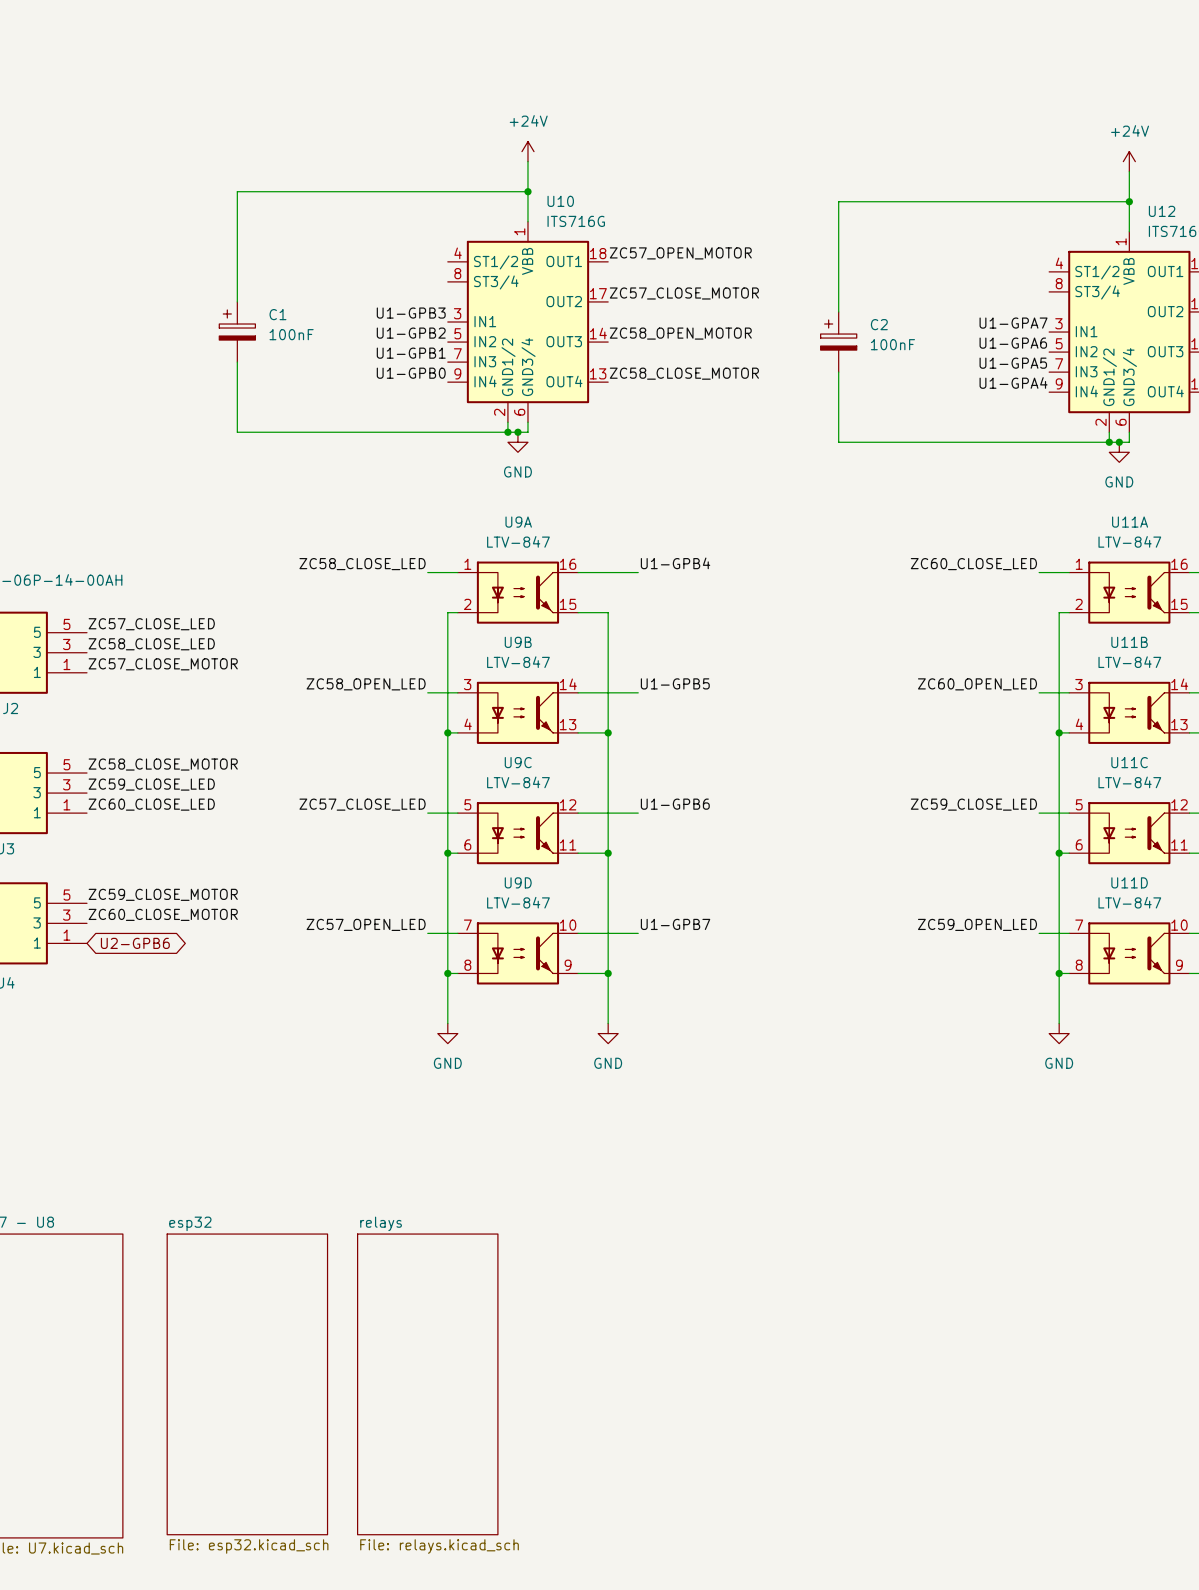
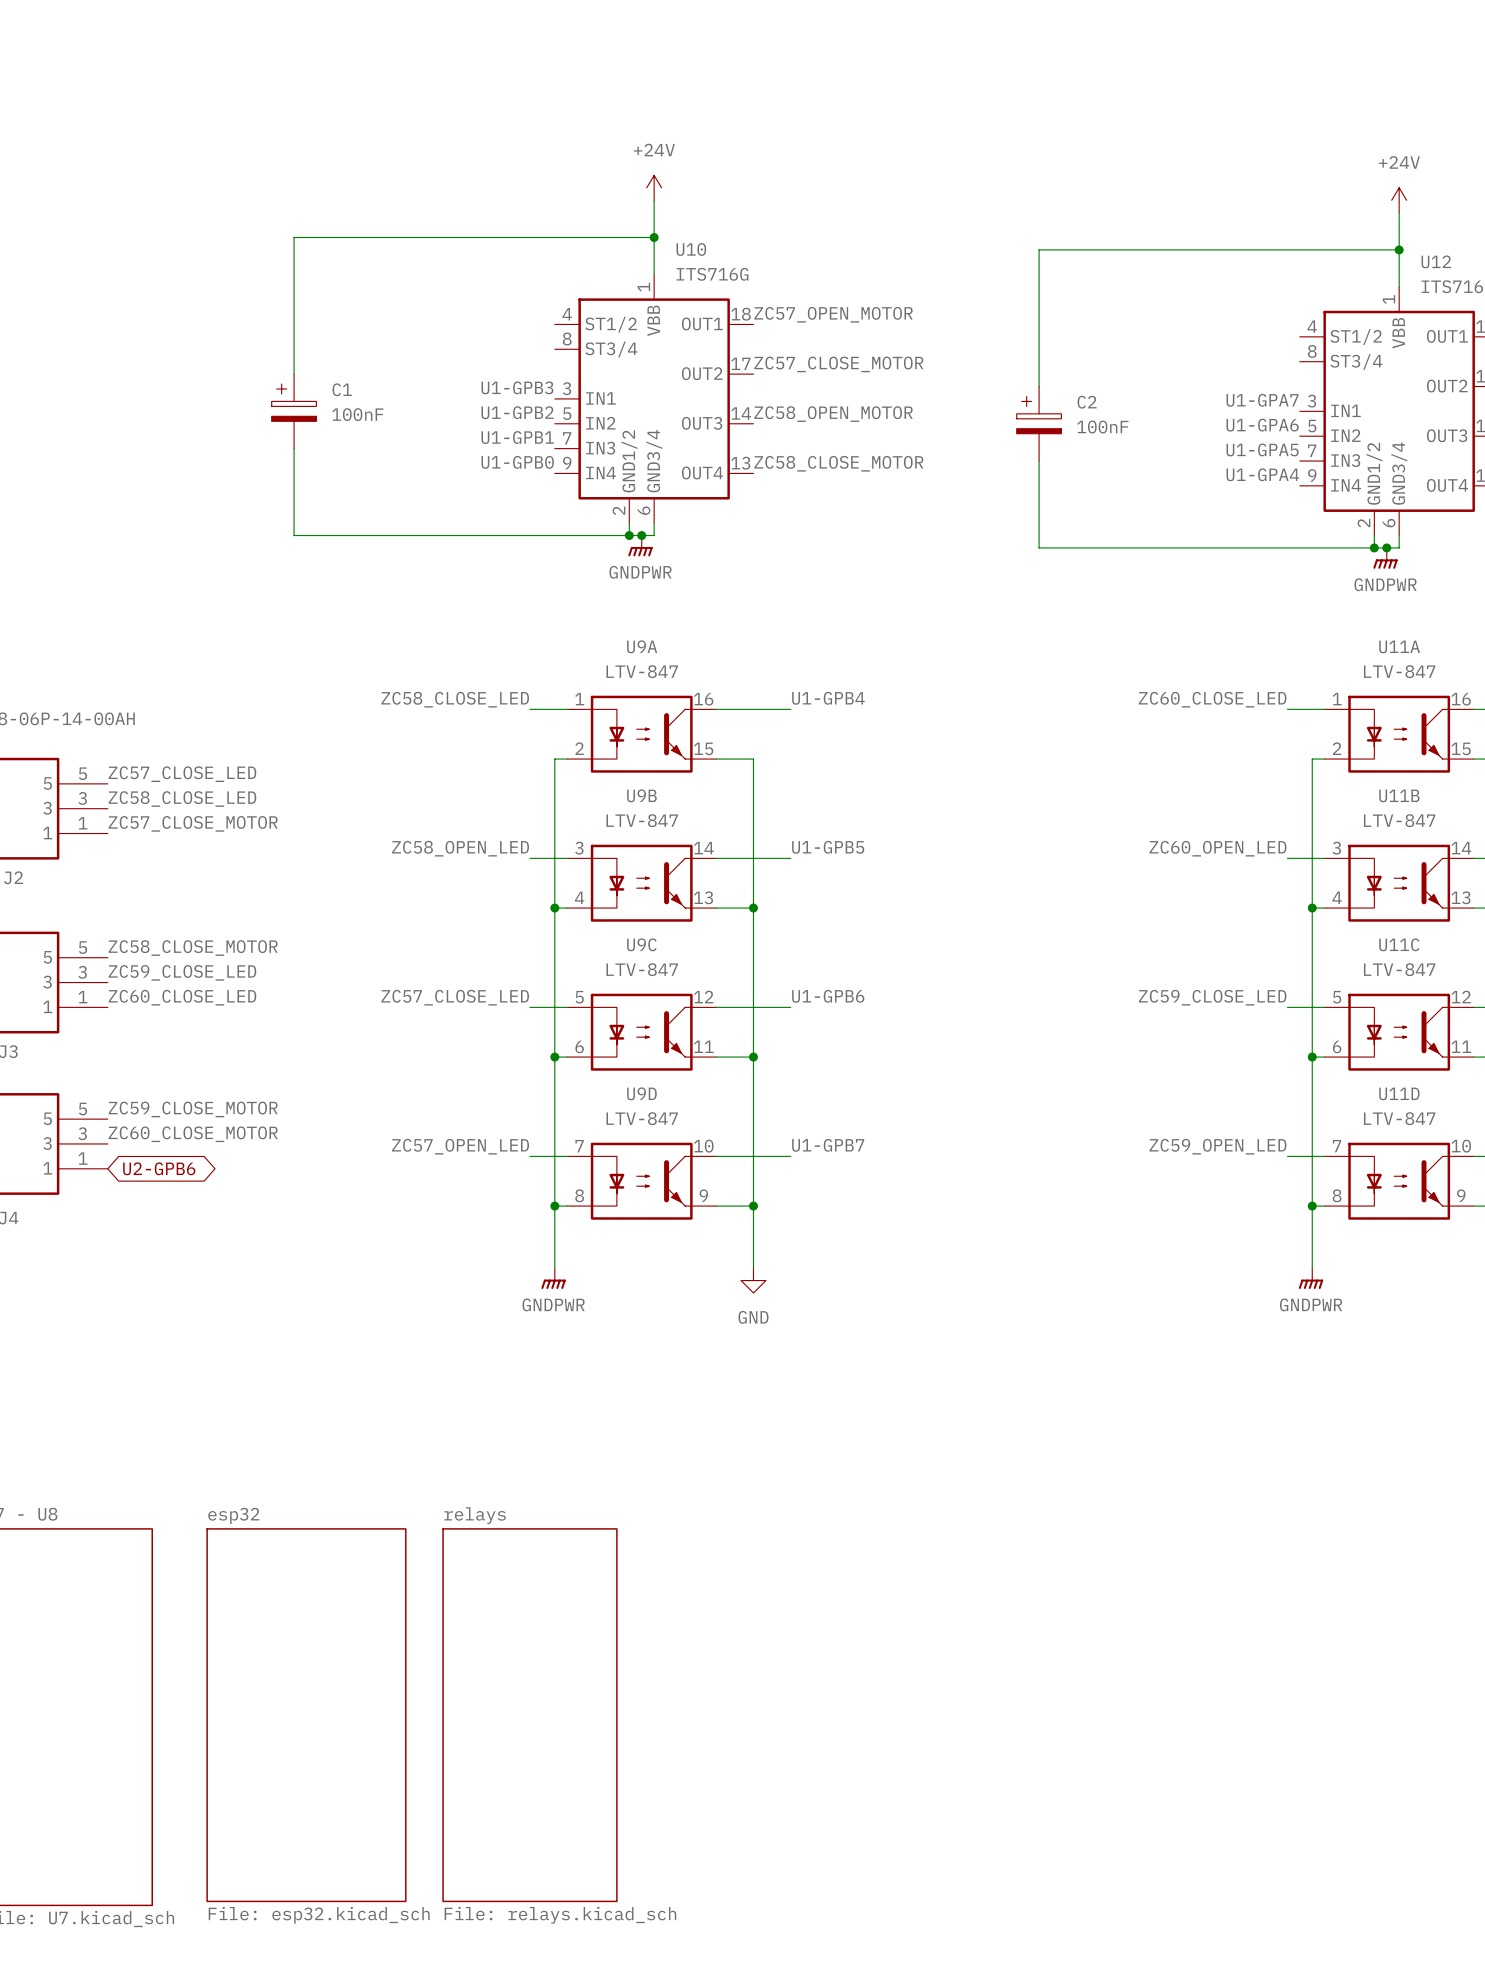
power symbol: GND (517, 442) -> GNDPWR (640, 545)
power symbol: GND (1119, 452) -> GNDPWR (1385, 558)
power symbol: GND (447, 1033) -> GNDPWR (553, 1278)
power symbol: GND (1059, 1033) -> GNDPWR (1311, 1278)

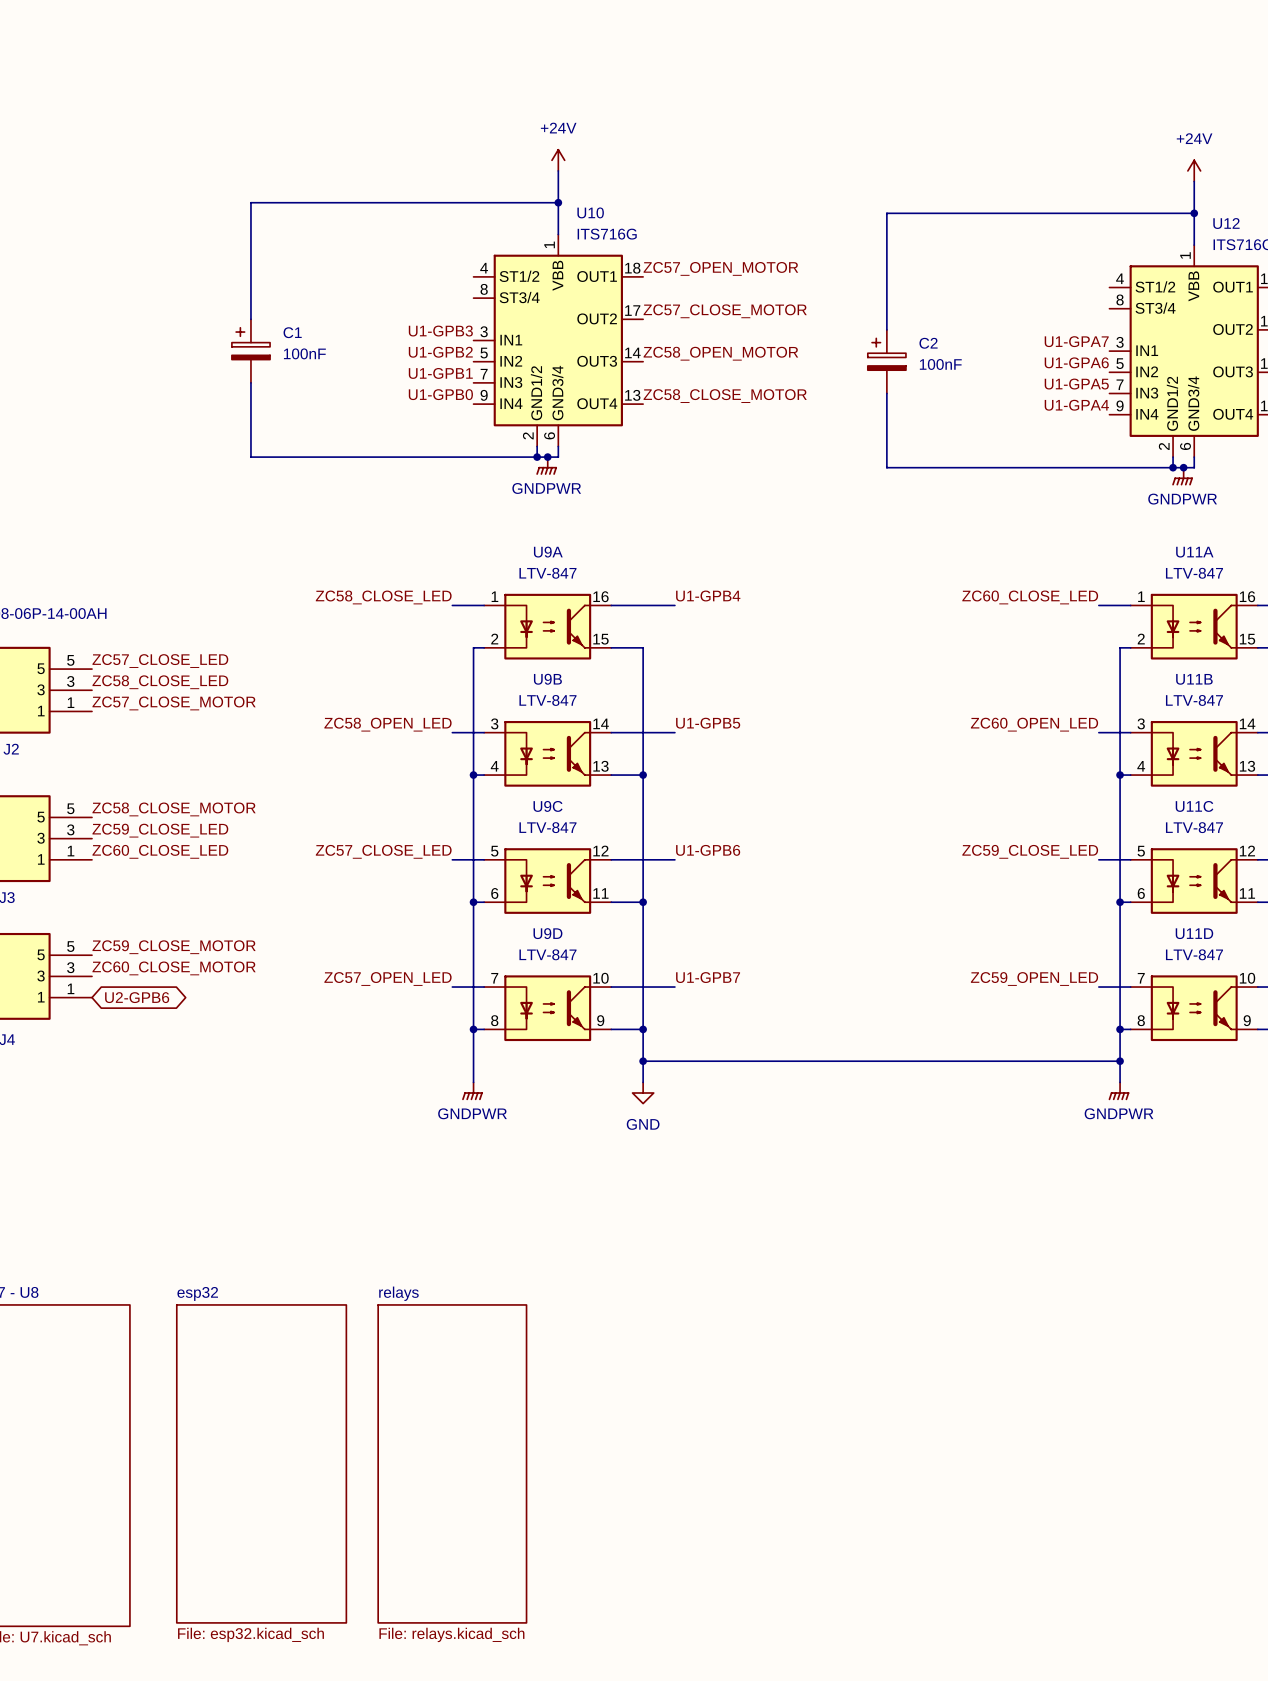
wire: none -> (643, 1061) (1120, 1061)
junction: none -> (643, 1061)
junction: none -> (1120, 1061)

